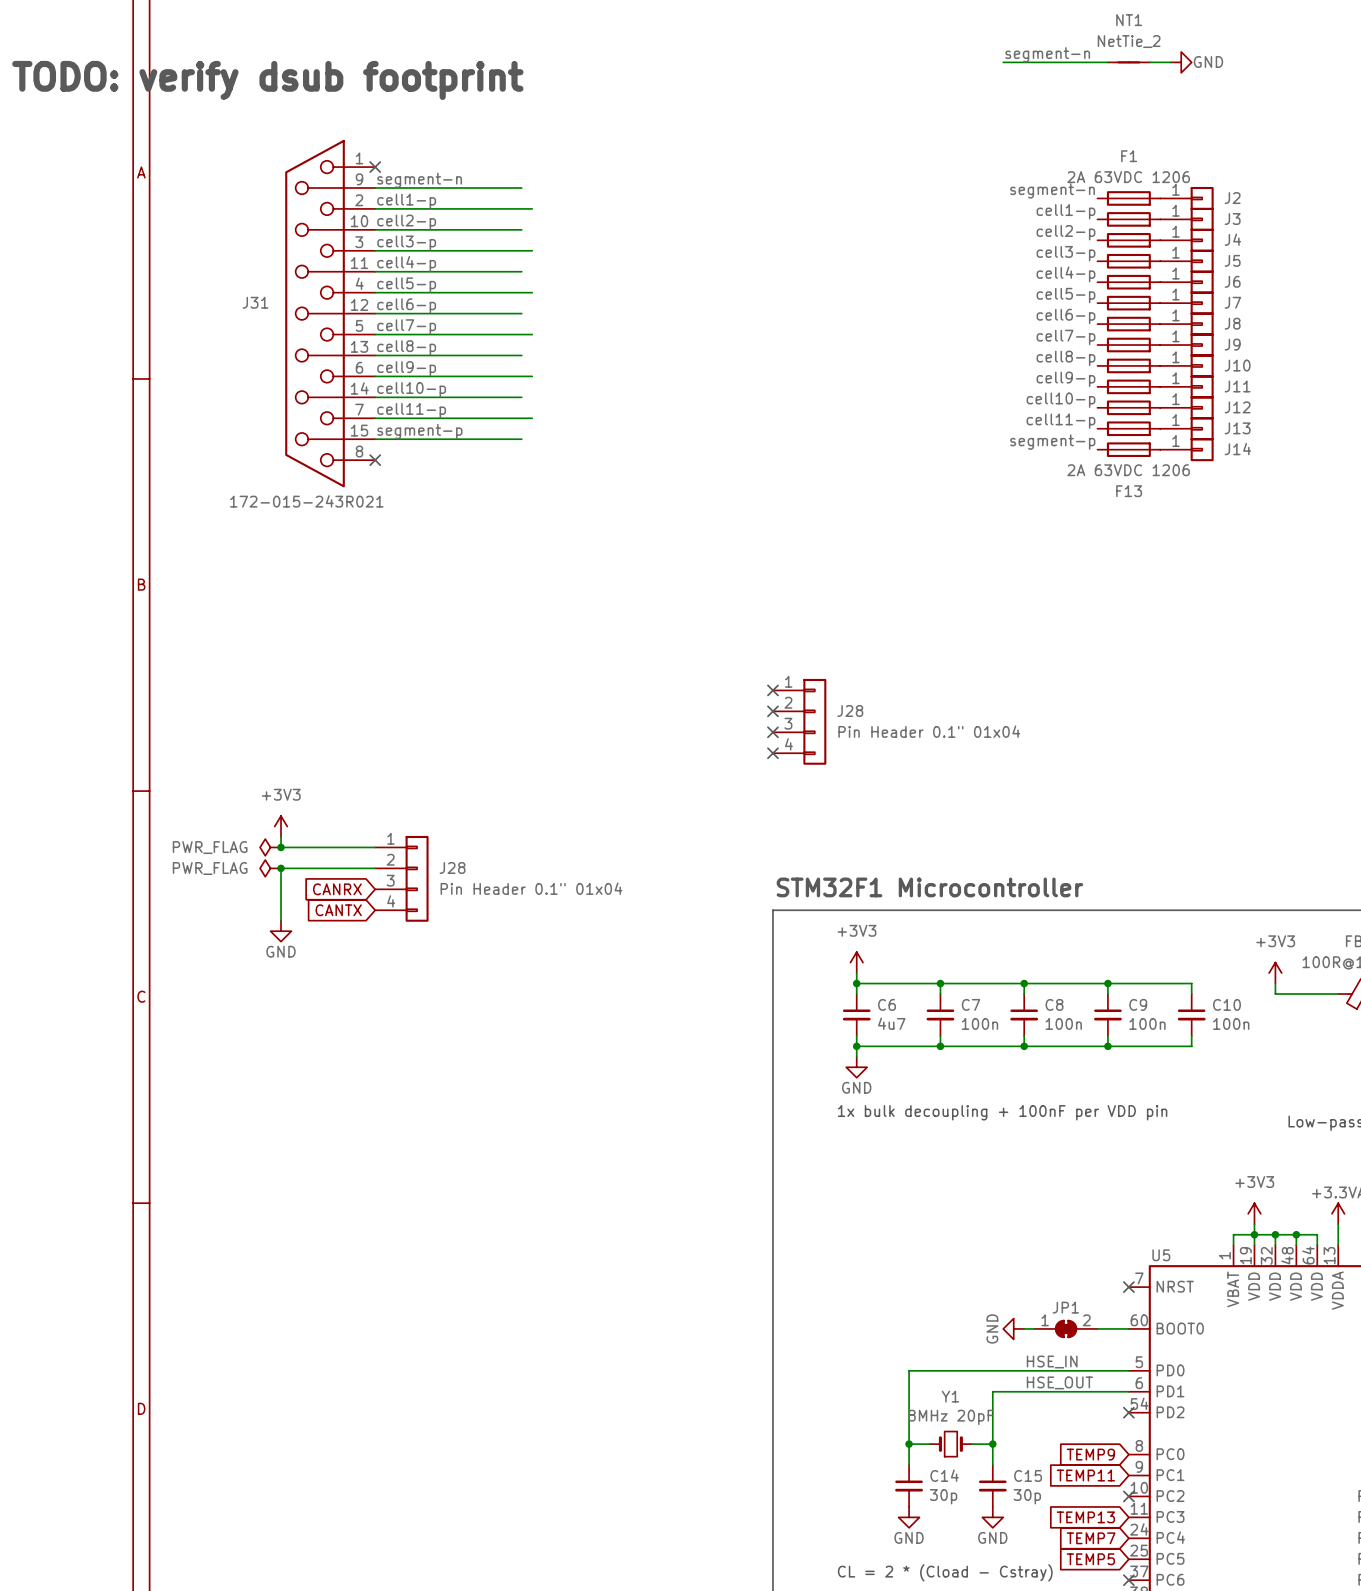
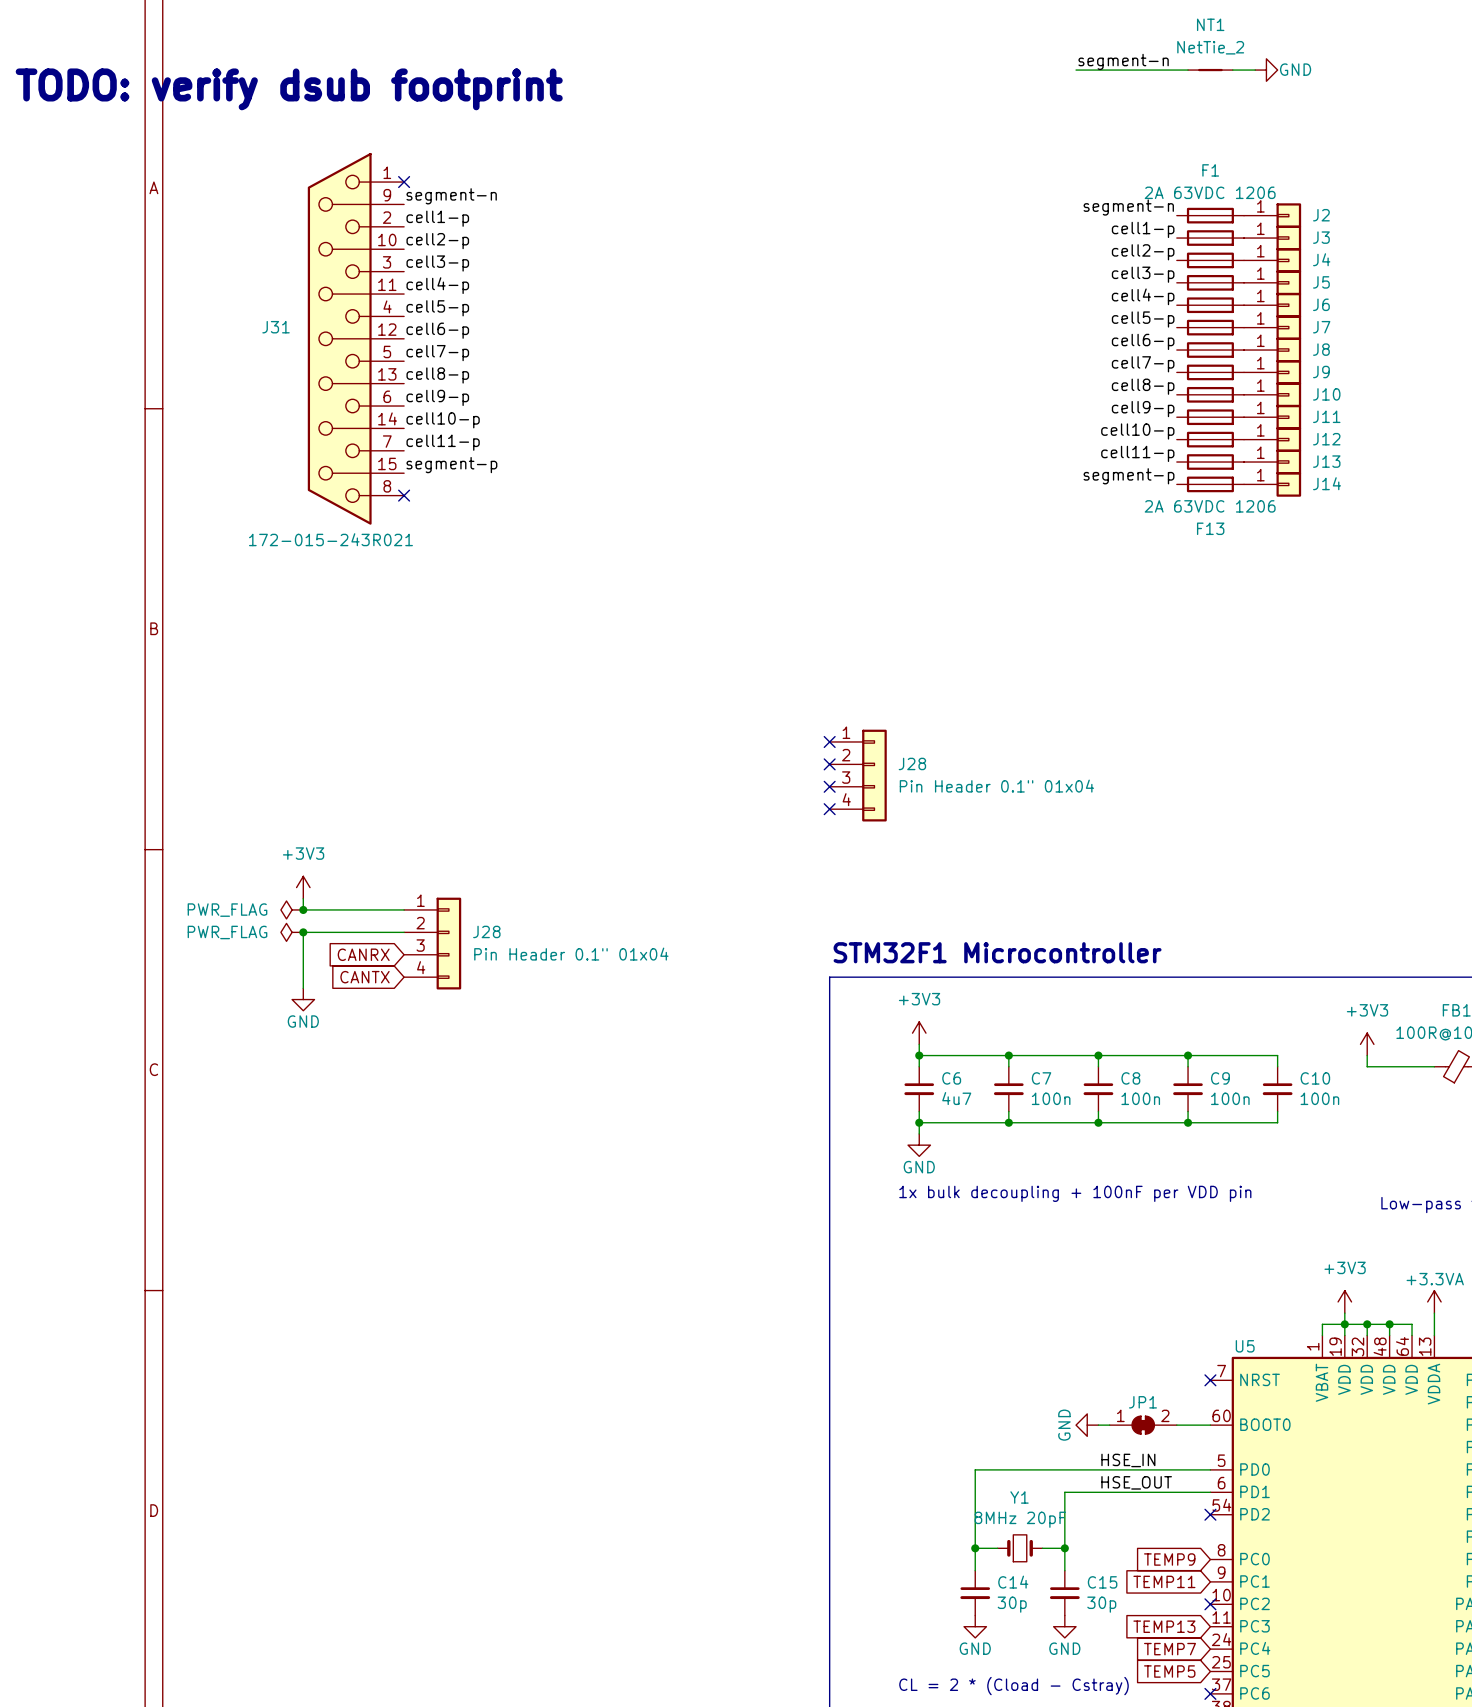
wire: (375, 187) (521, 187) -> none
wire: (375, 208) (532, 208) -> none
wire: (375, 229) (521, 229) -> none
wire: (375, 250) (532, 250) -> none
wire: (375, 271) (521, 271) -> none
wire: (375, 292) (532, 292) -> none
wire: (375, 313) (521, 313) -> none
wire: (375, 334) (532, 334) -> none
wire: (375, 355) (521, 355) -> none
wire: (375, 376) (532, 376) -> none
wire: (375, 397) (521, 397) -> none
wire: (375, 418) (532, 418) -> none
wire: (375, 439) (521, 439) -> none

